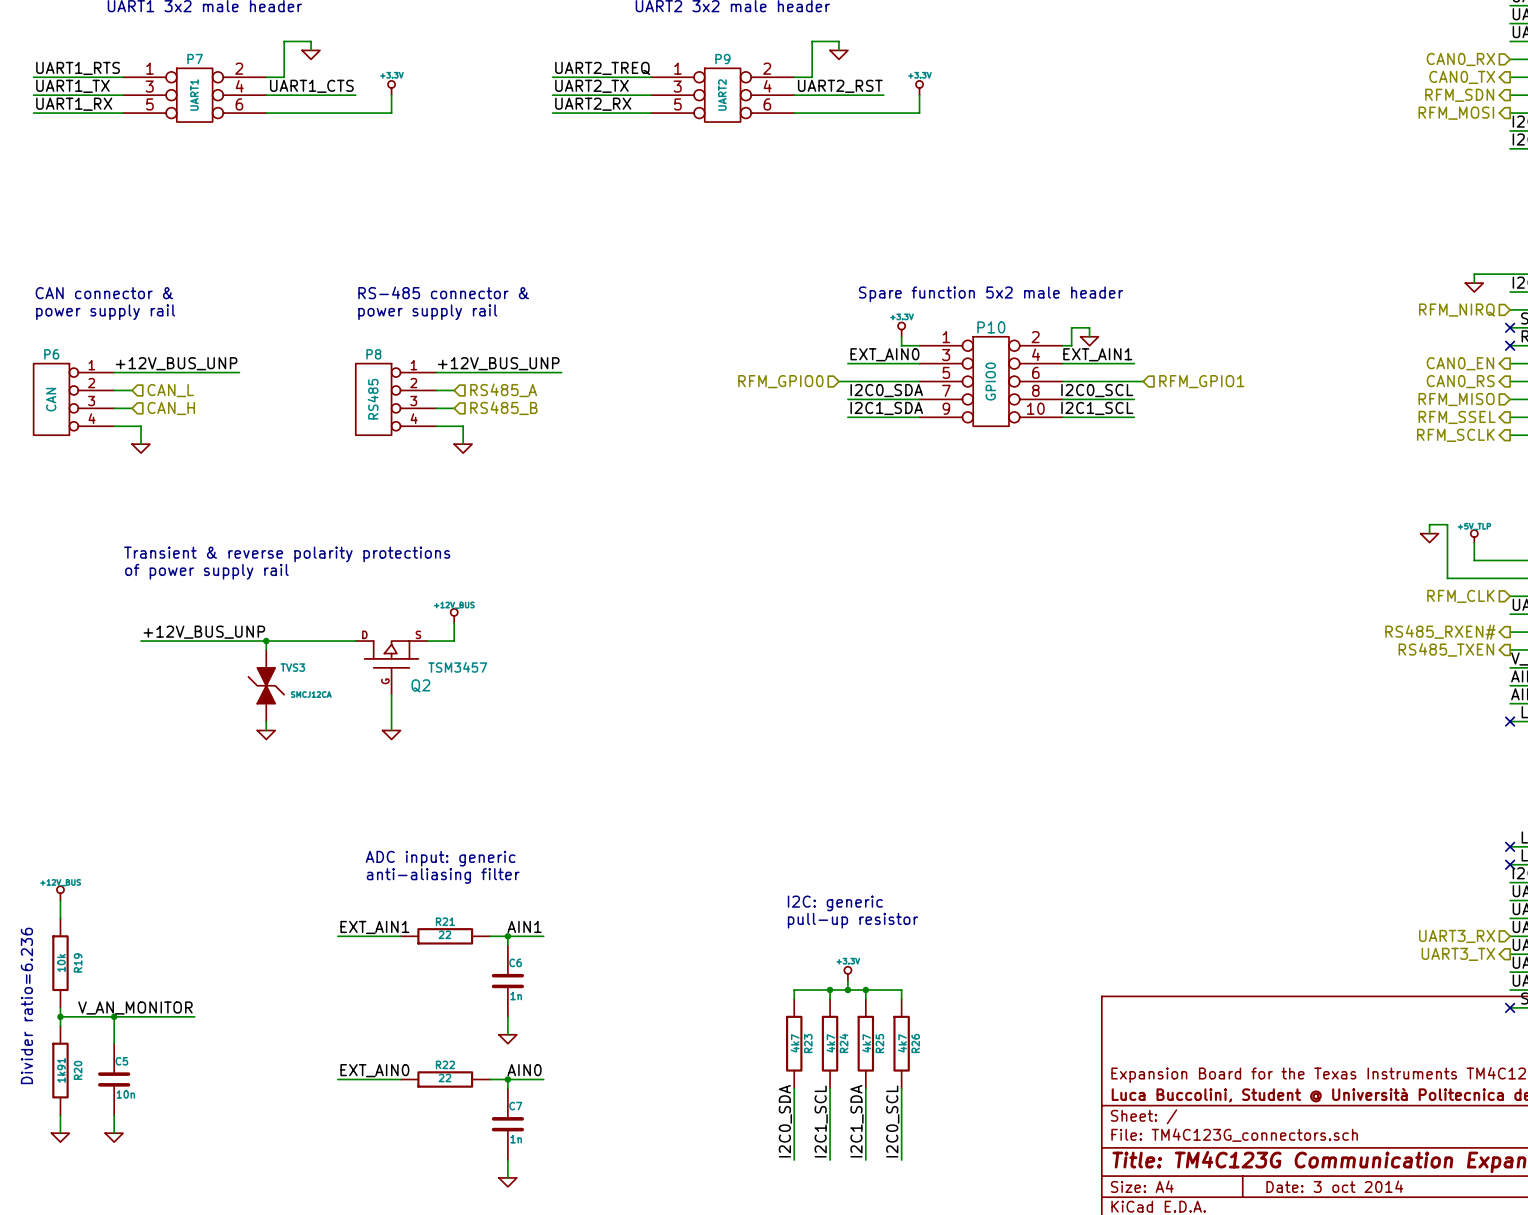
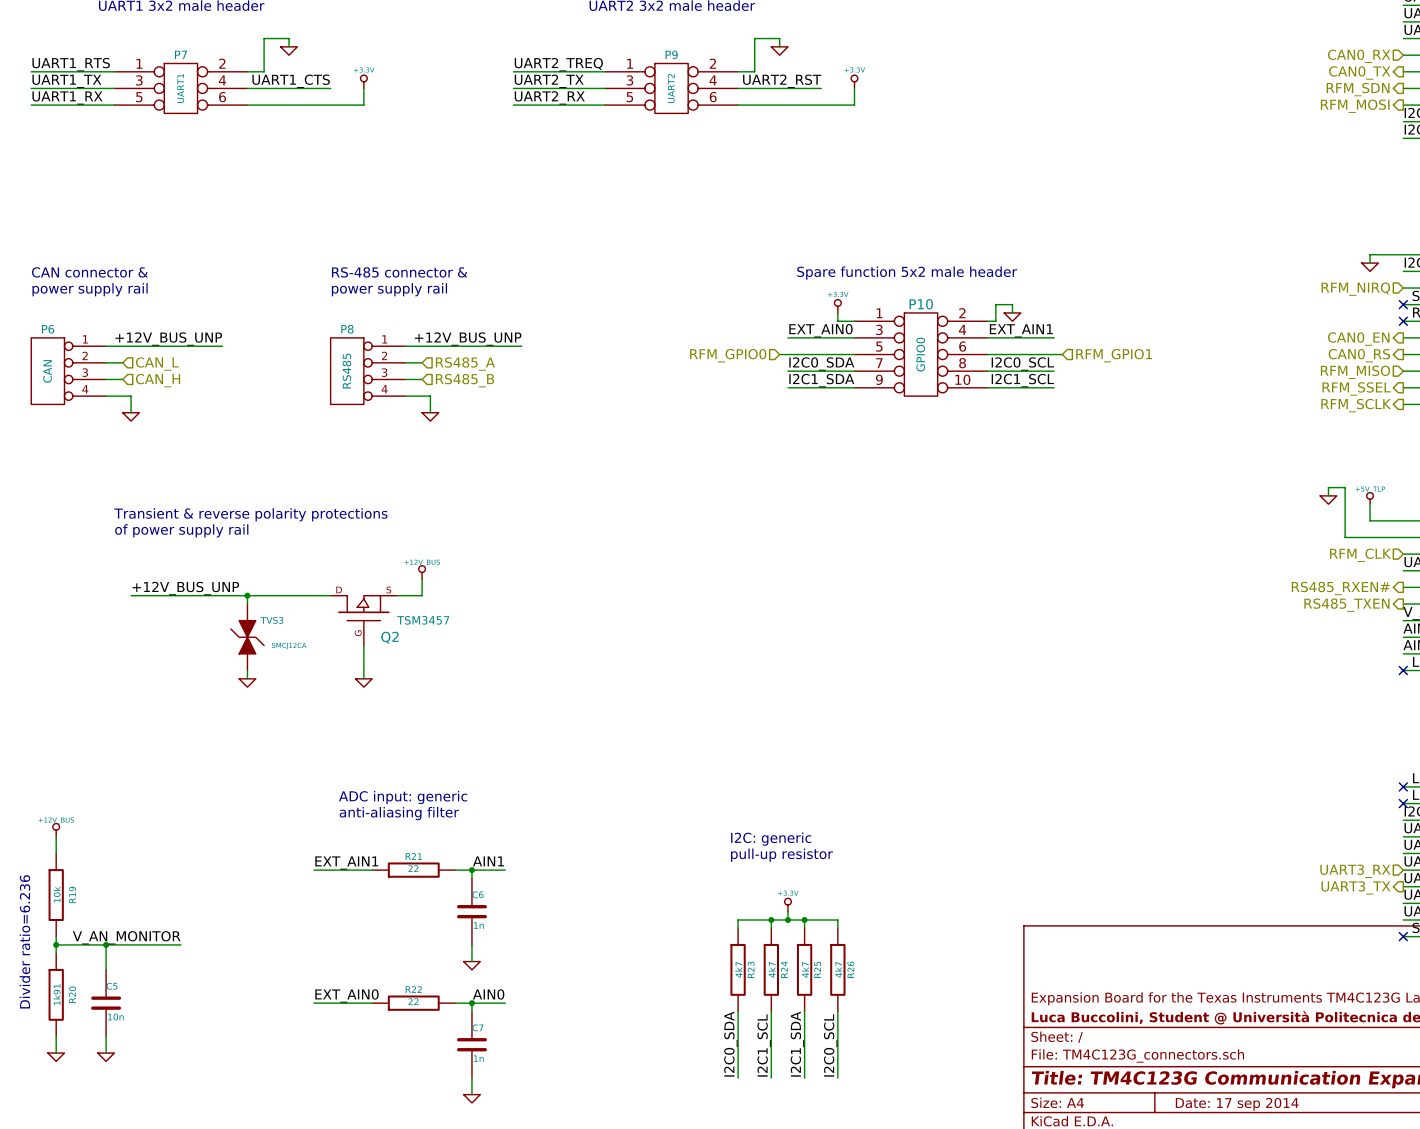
title block: Date: 3 oct 2014 (1334, 1186) -> Date: 17 sep 2014 (1237, 1104)

